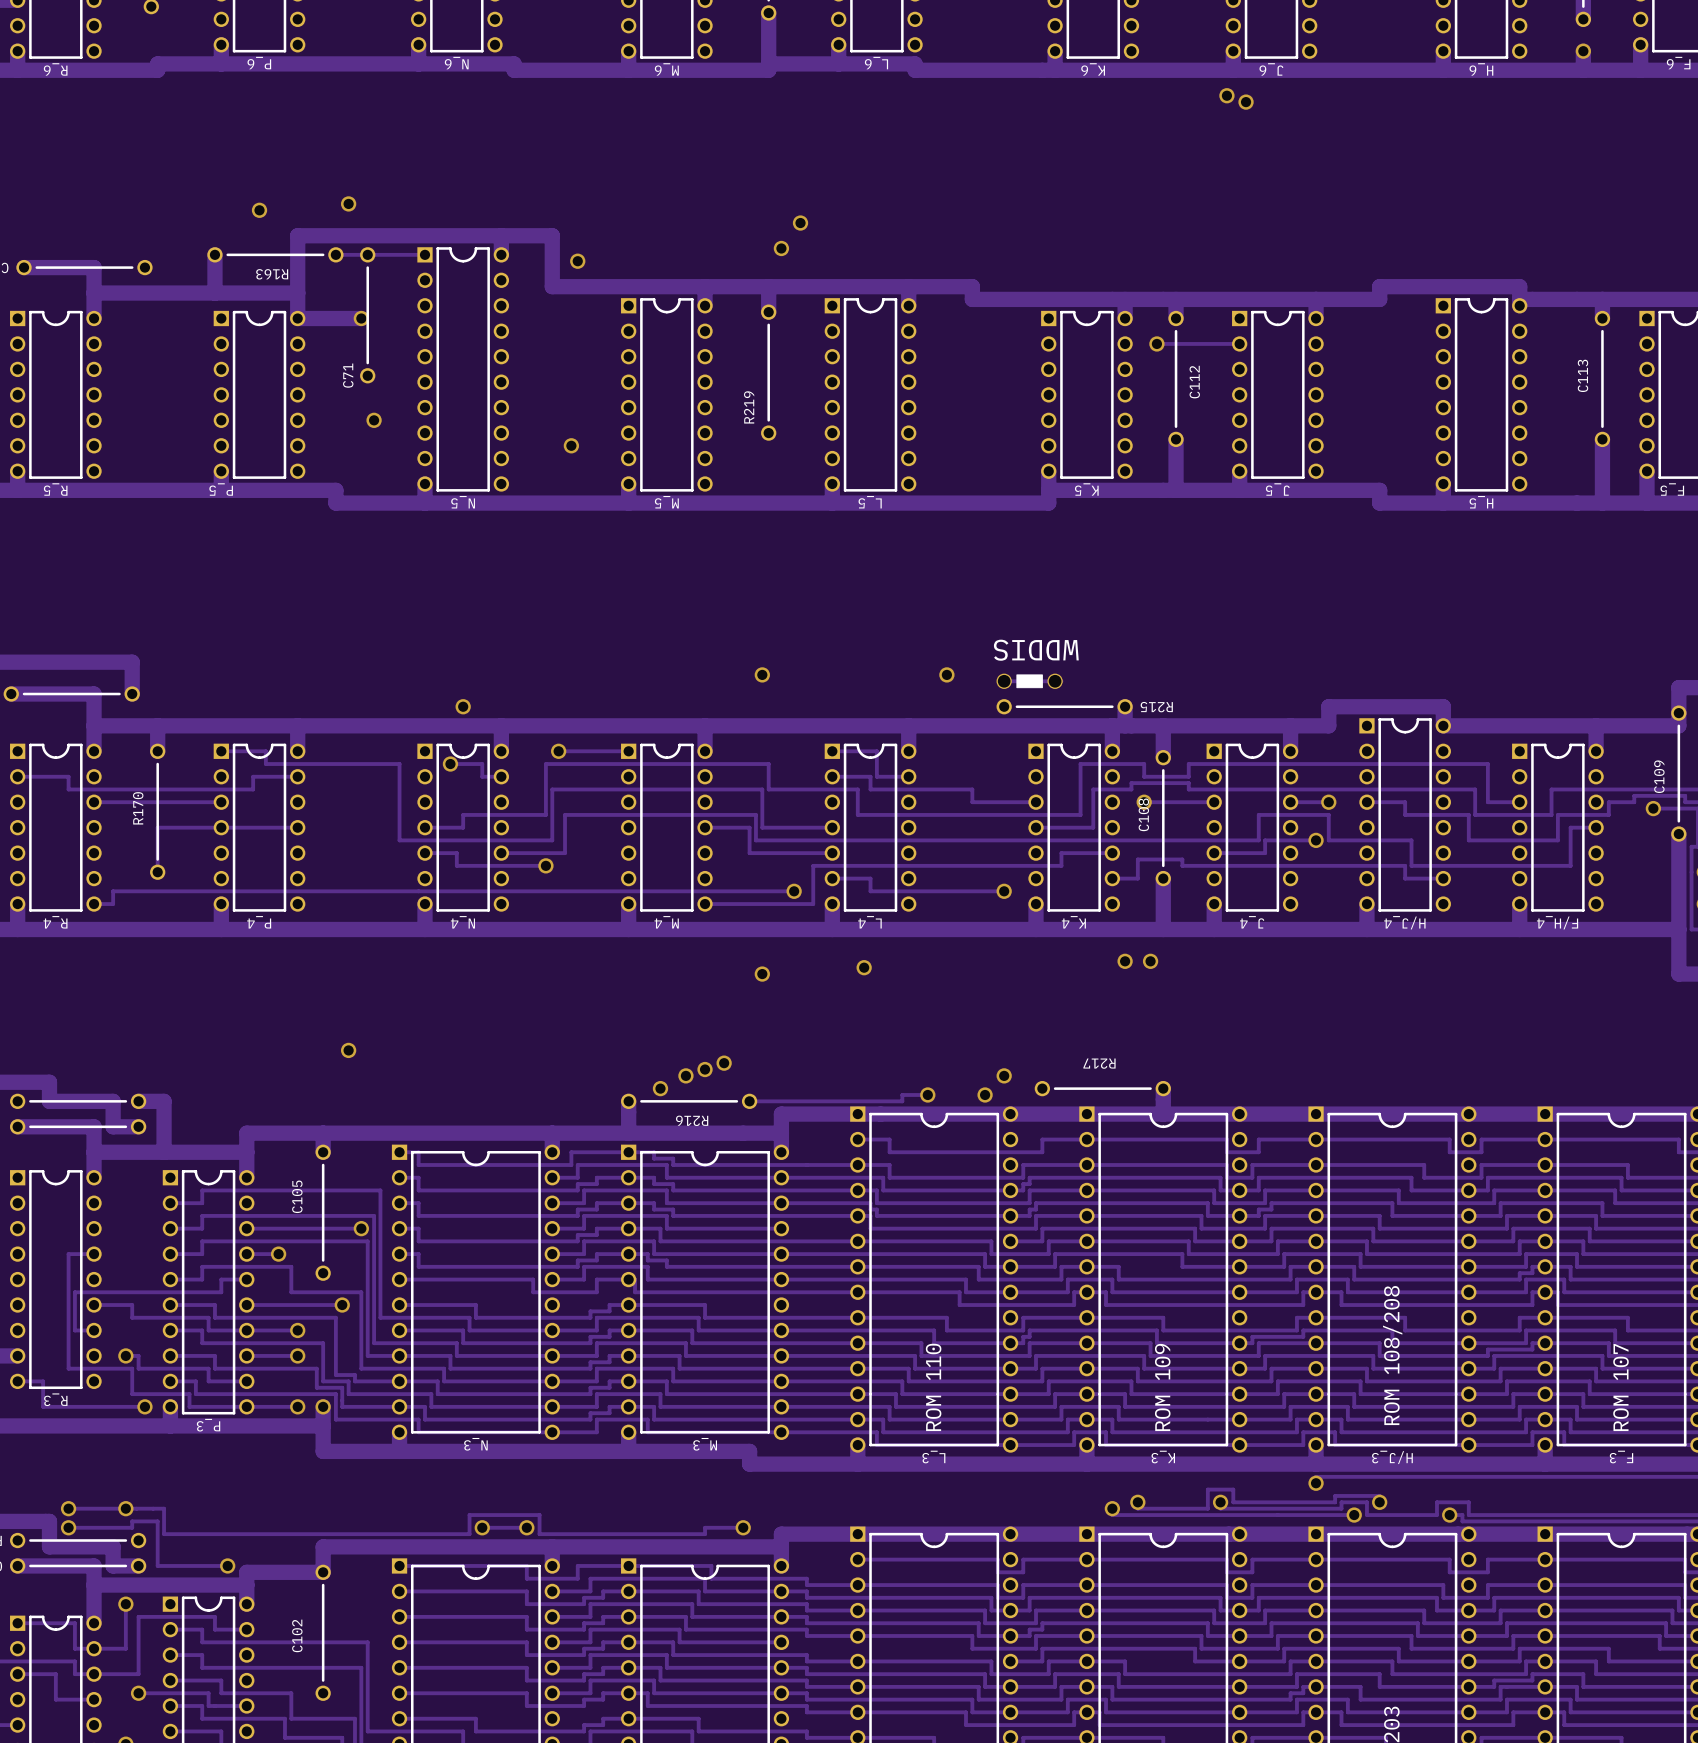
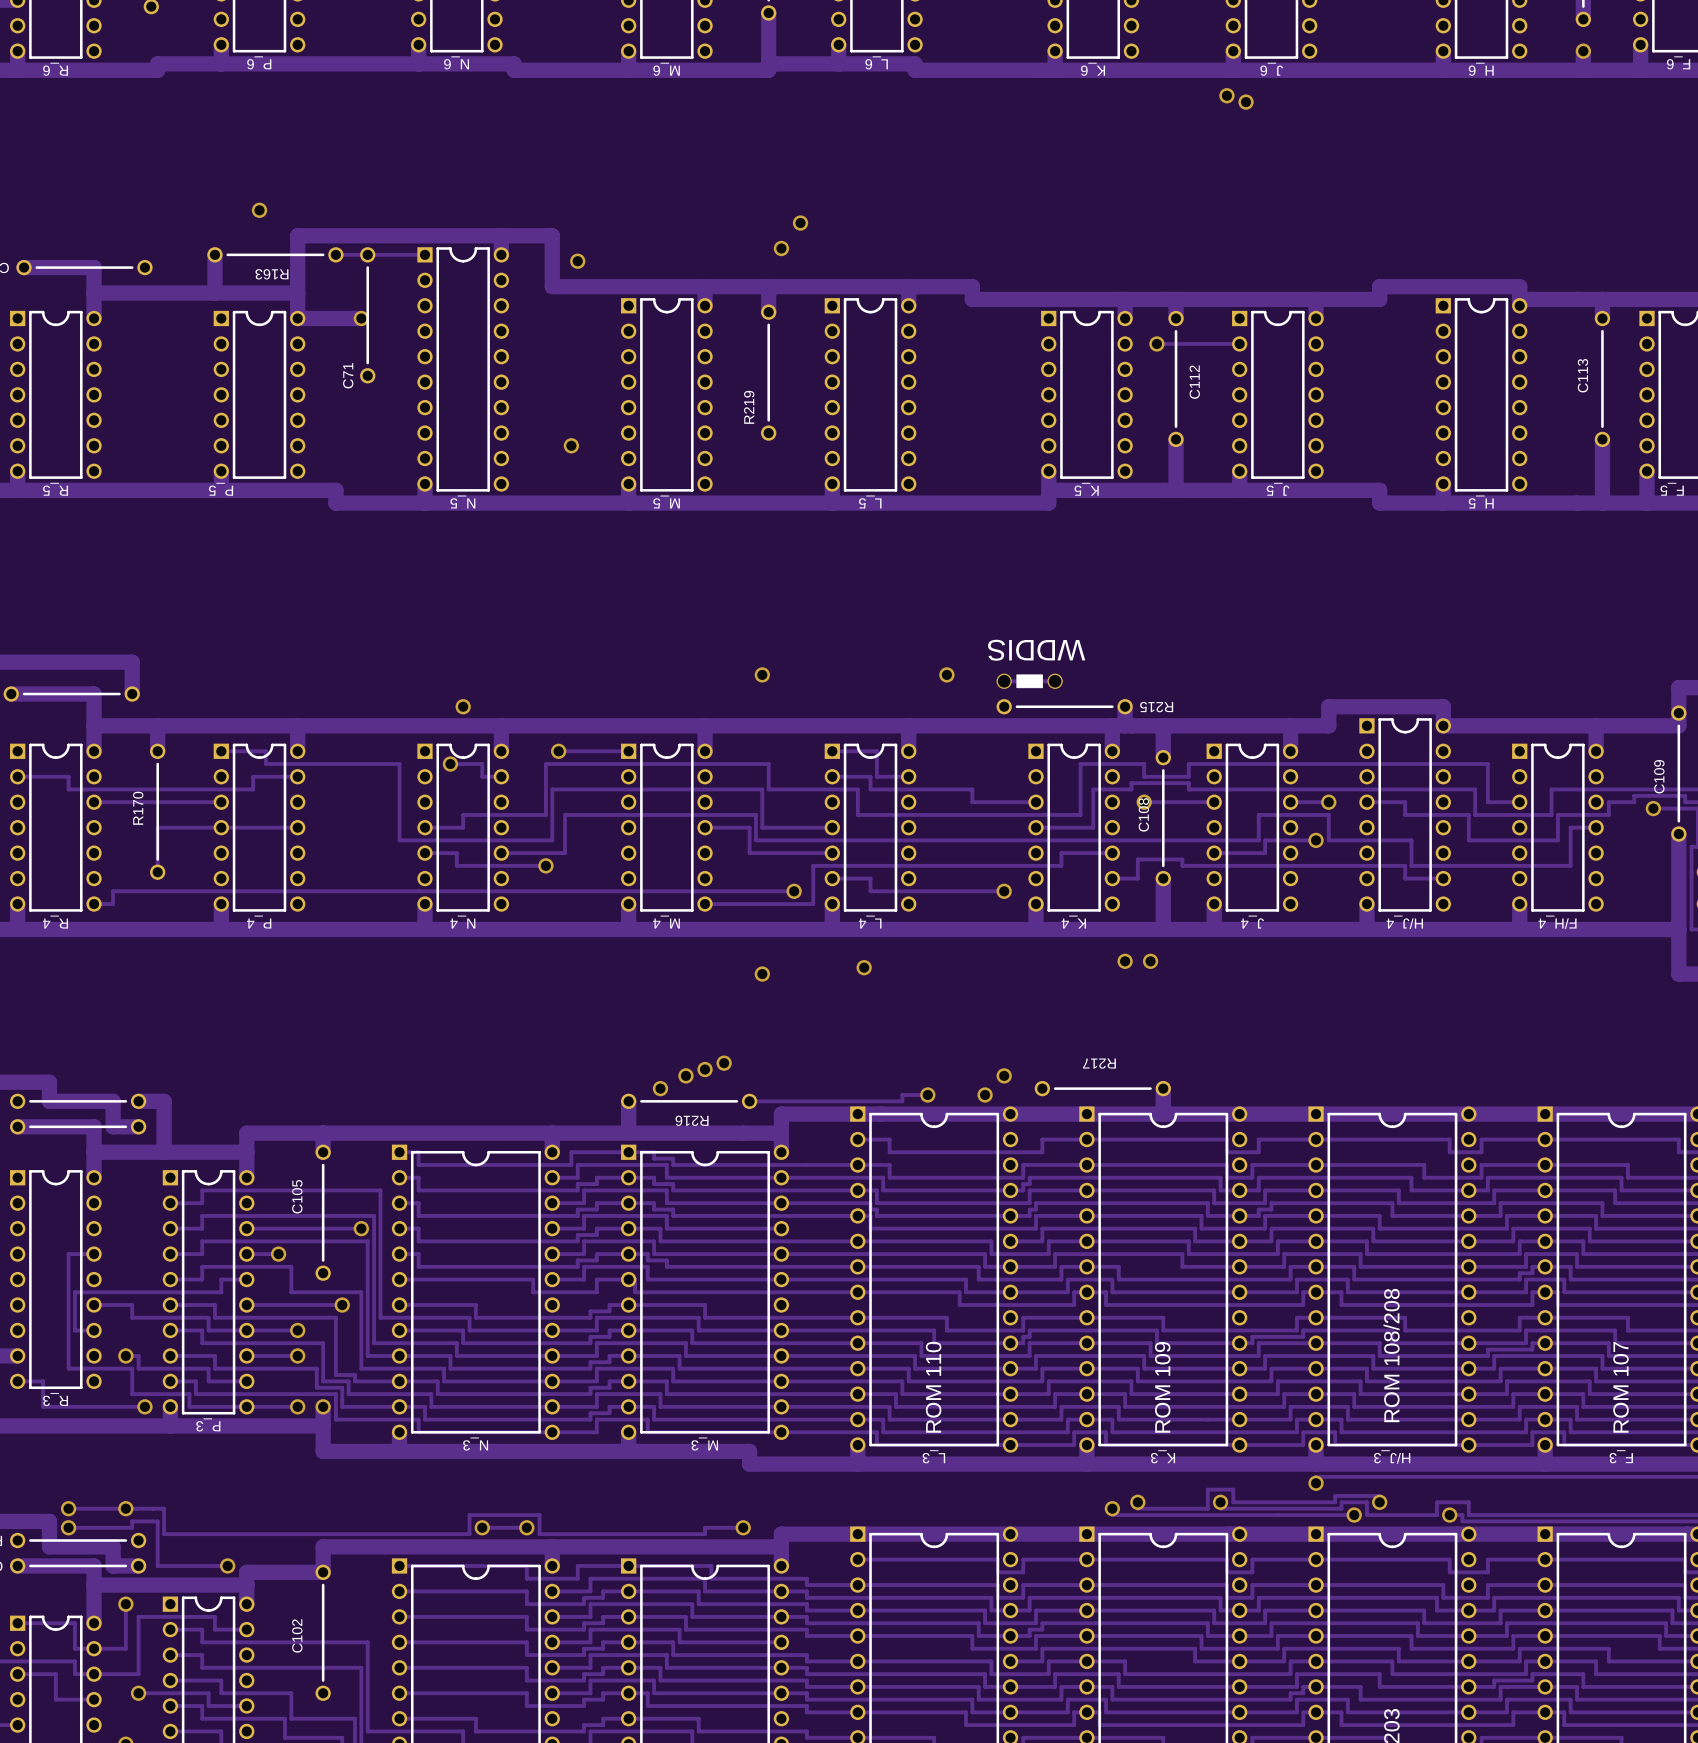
via: (348, 203) -> none
via: (374, 420) -> none
via: (348, 1050) -> none

